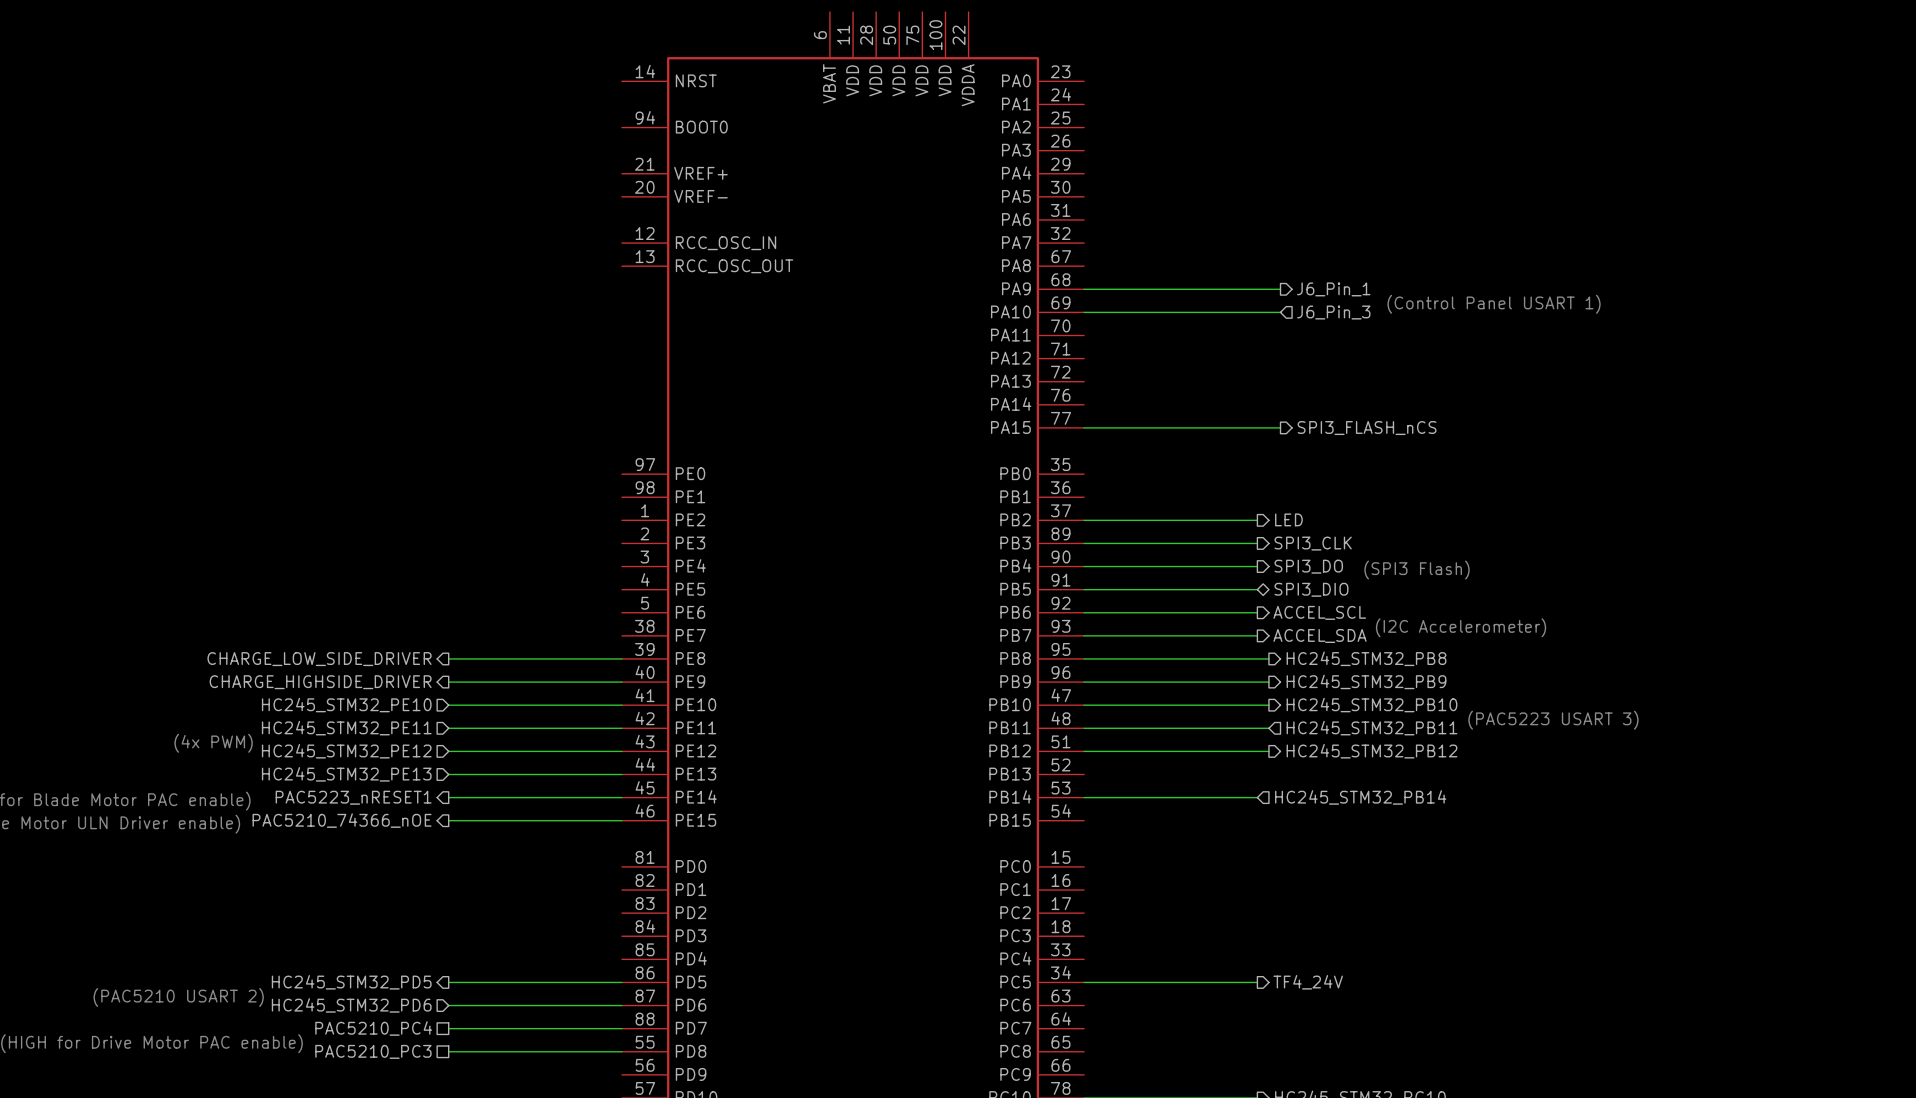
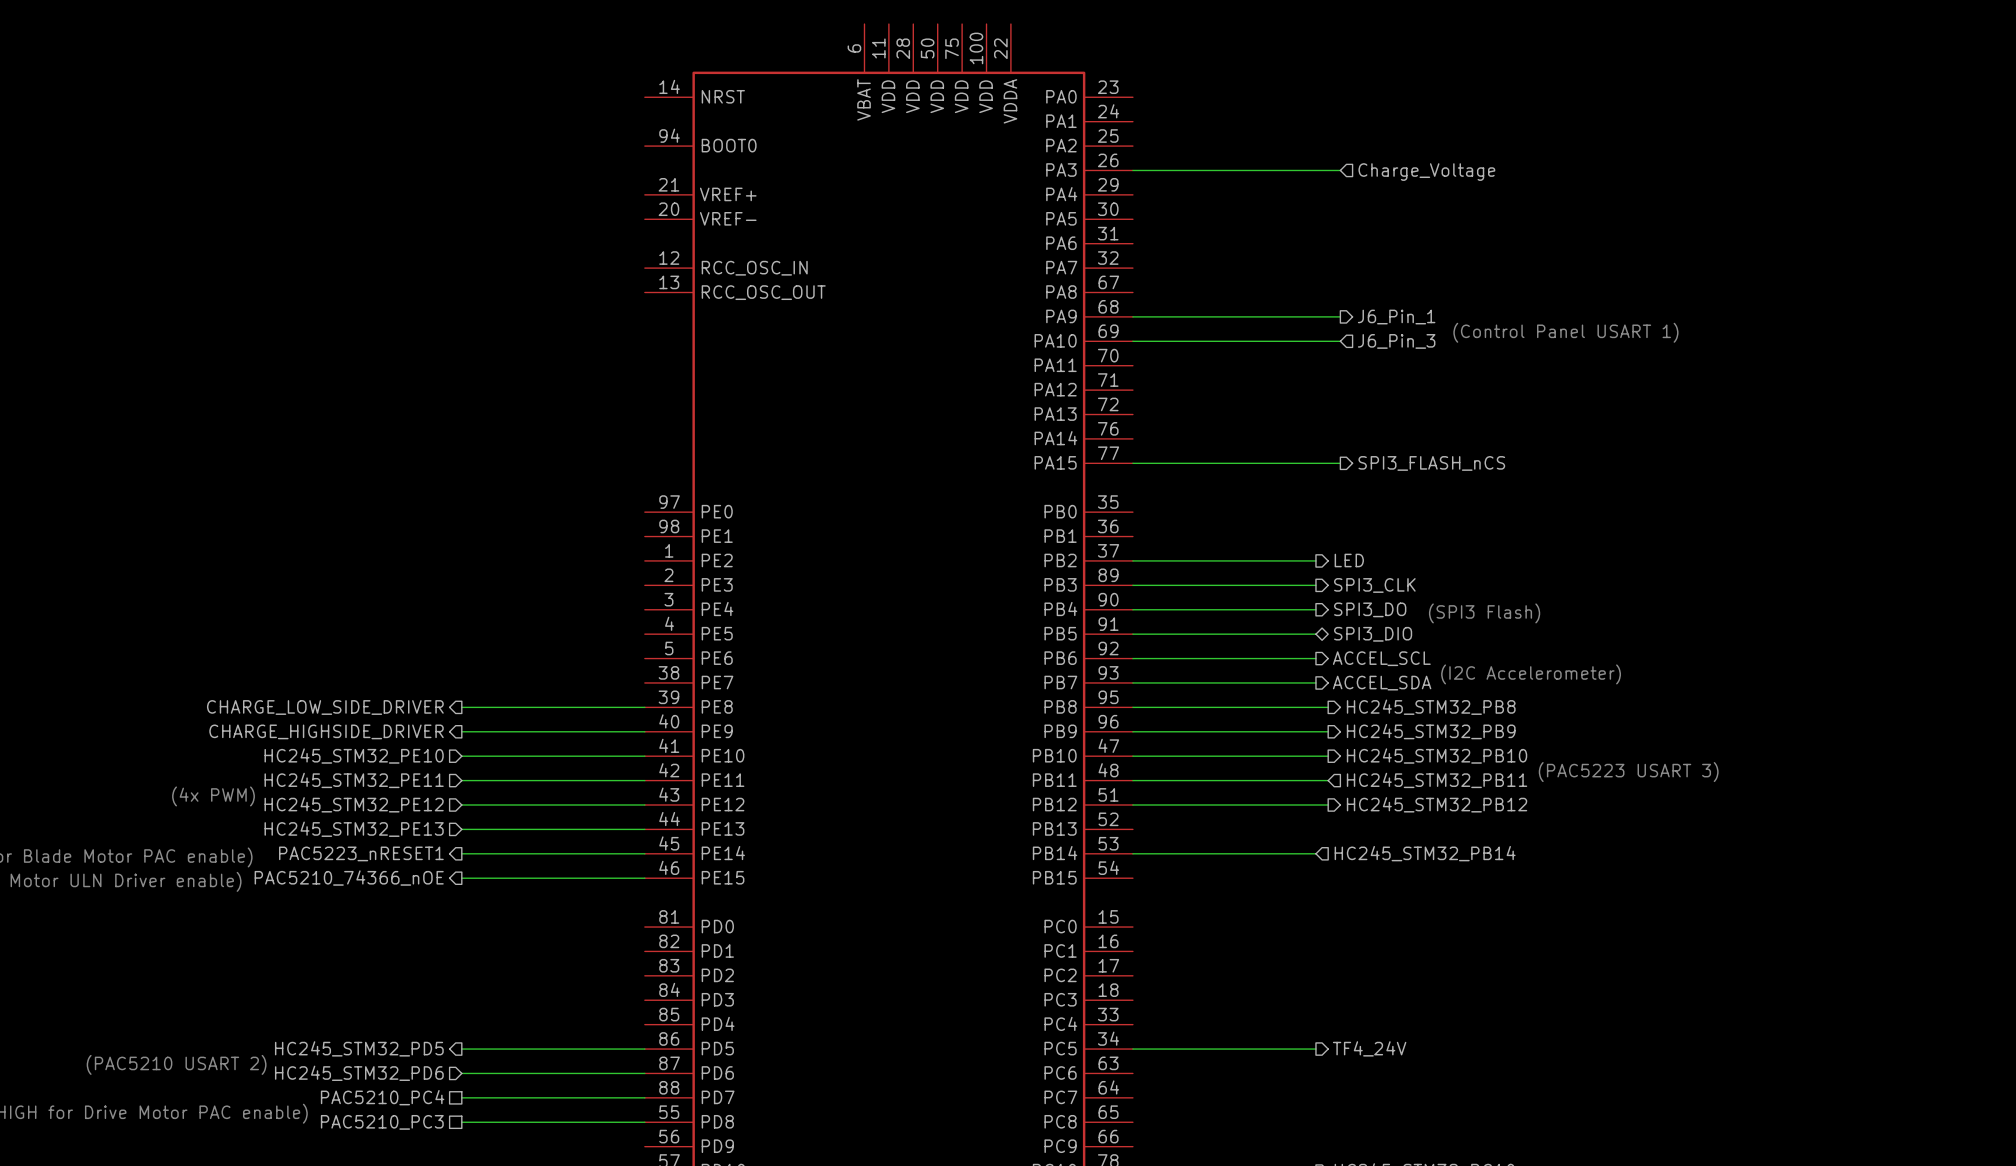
wire: none -> (1132, 170) (1340, 170)
hierarchical label: none -> Charge_Voltage (1426, 172)

